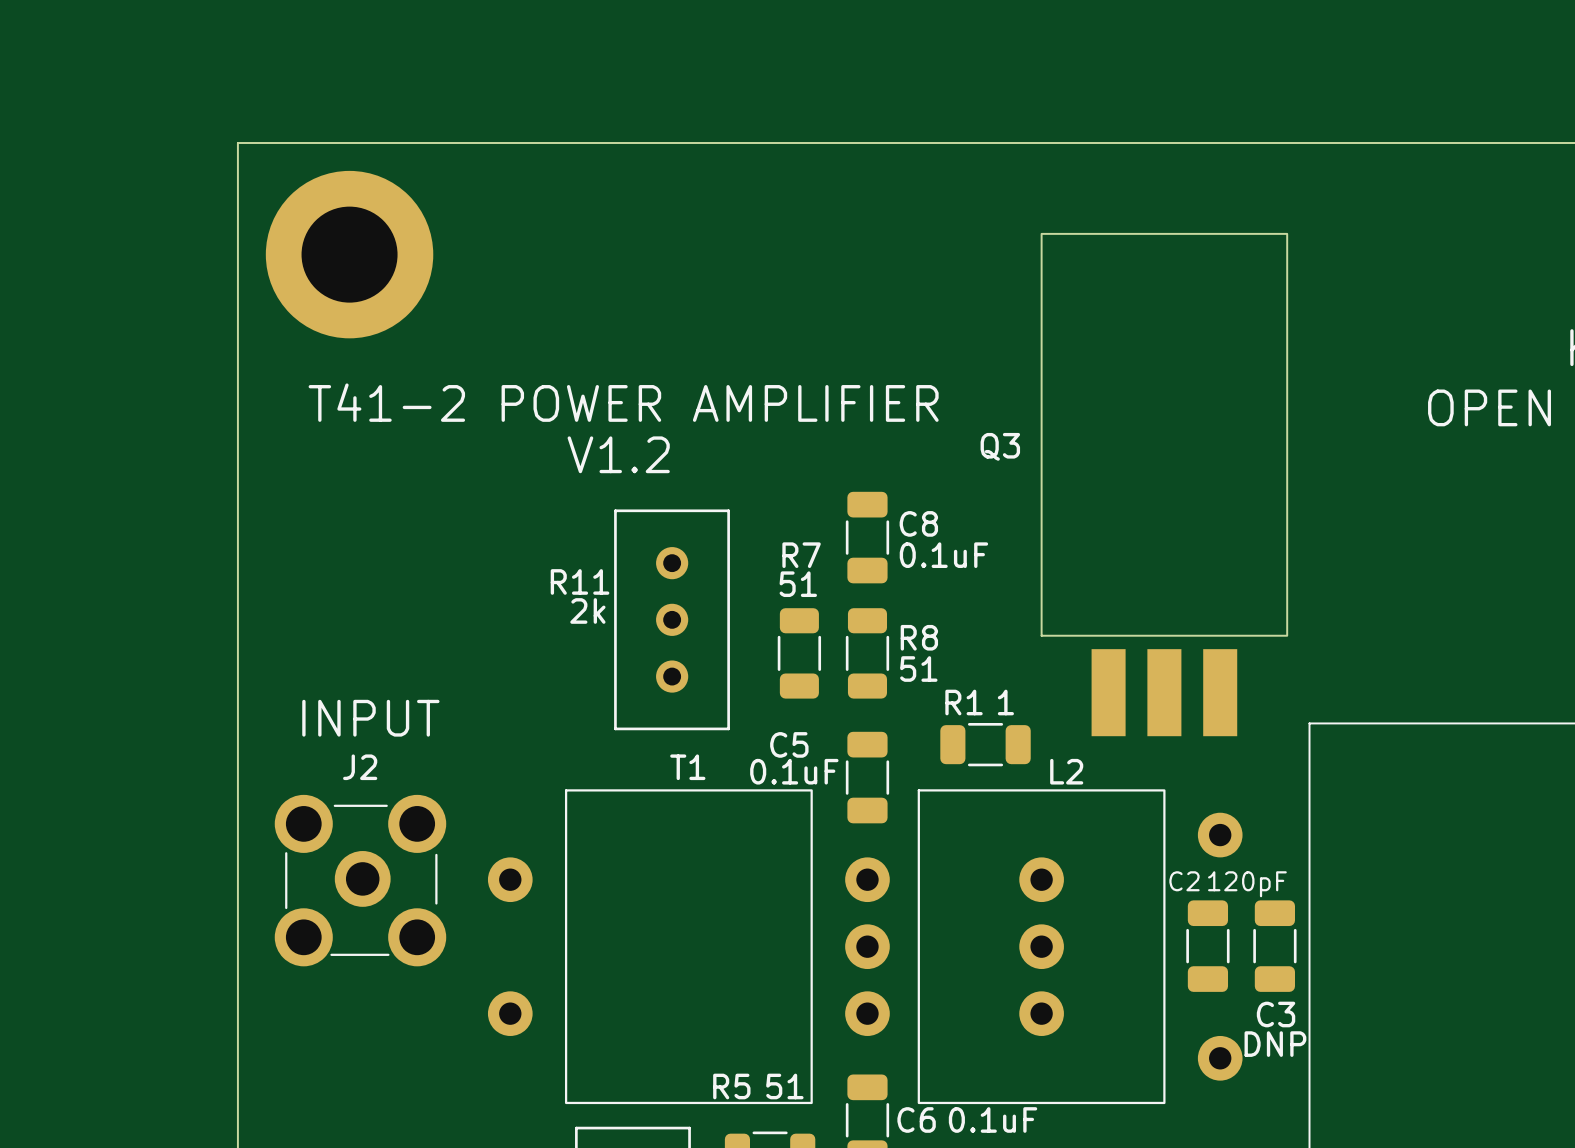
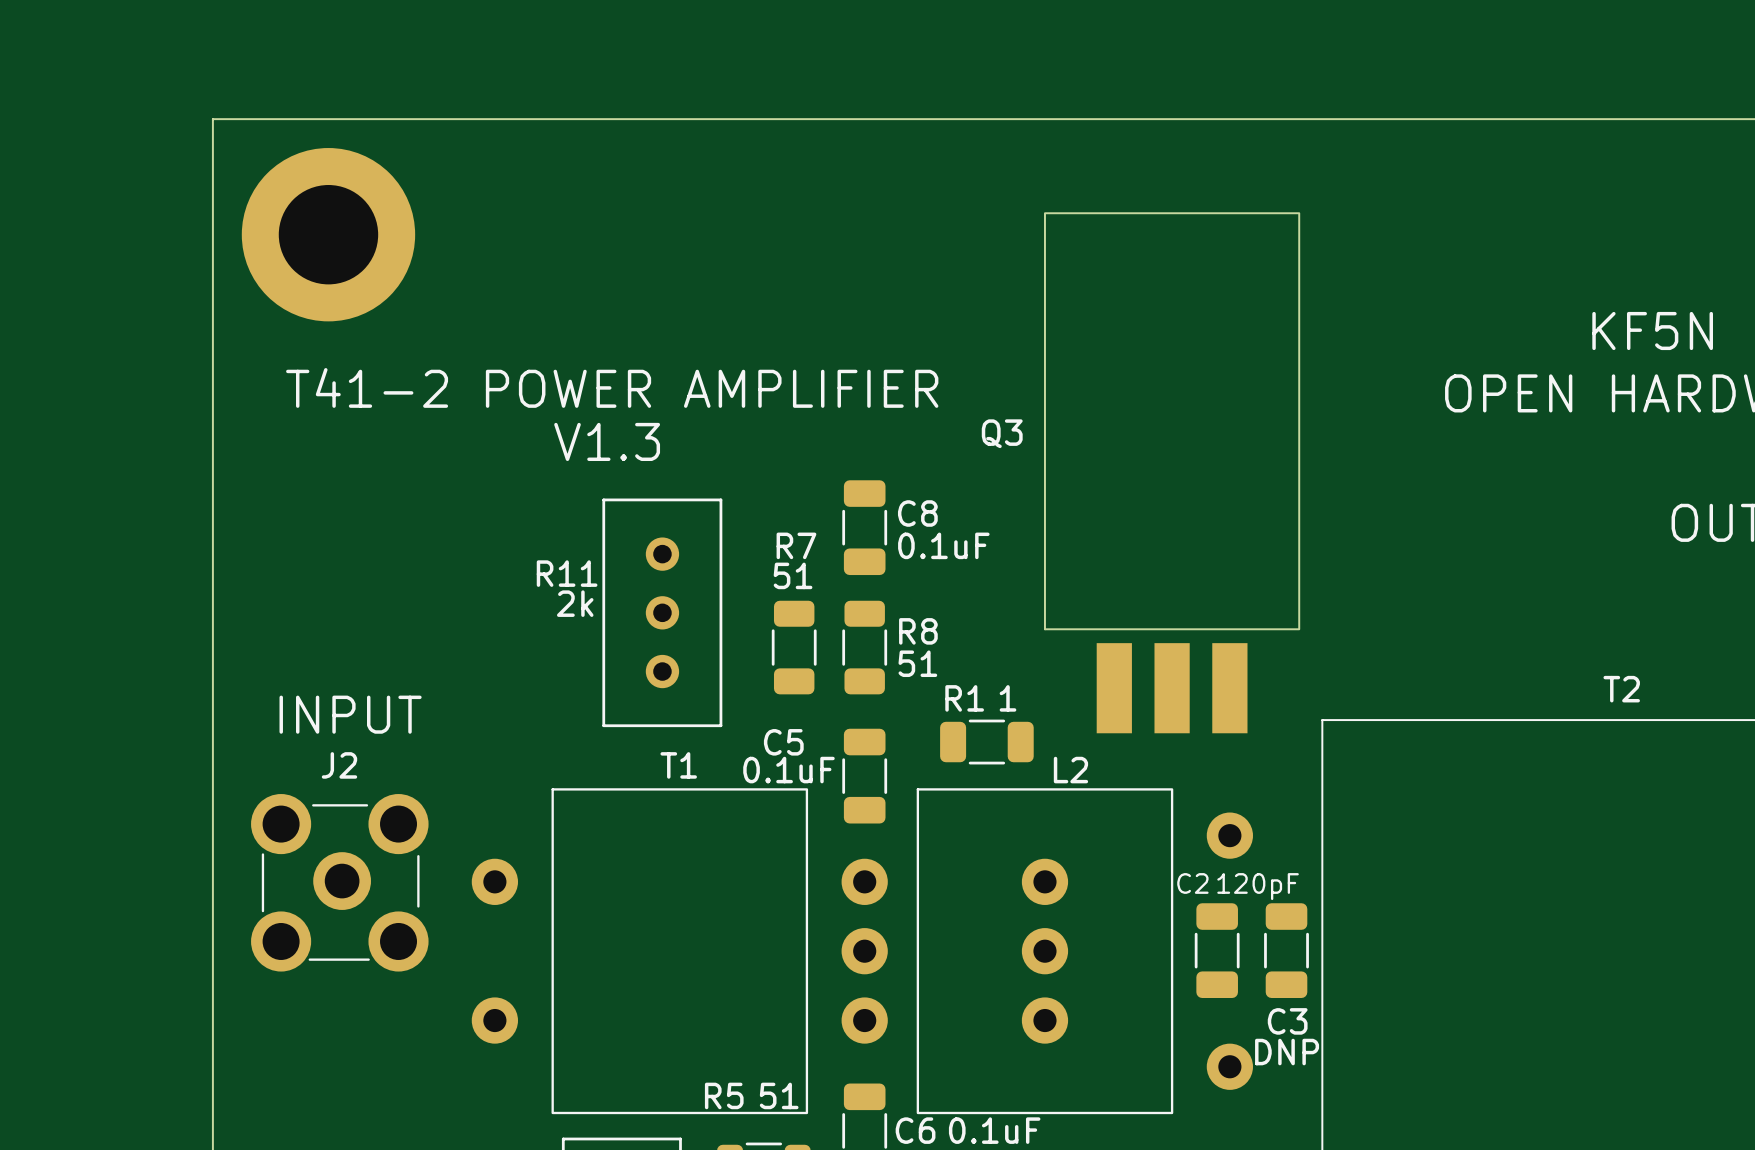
text: V1.2 (618, 454) -> V1.3 (607, 441)

